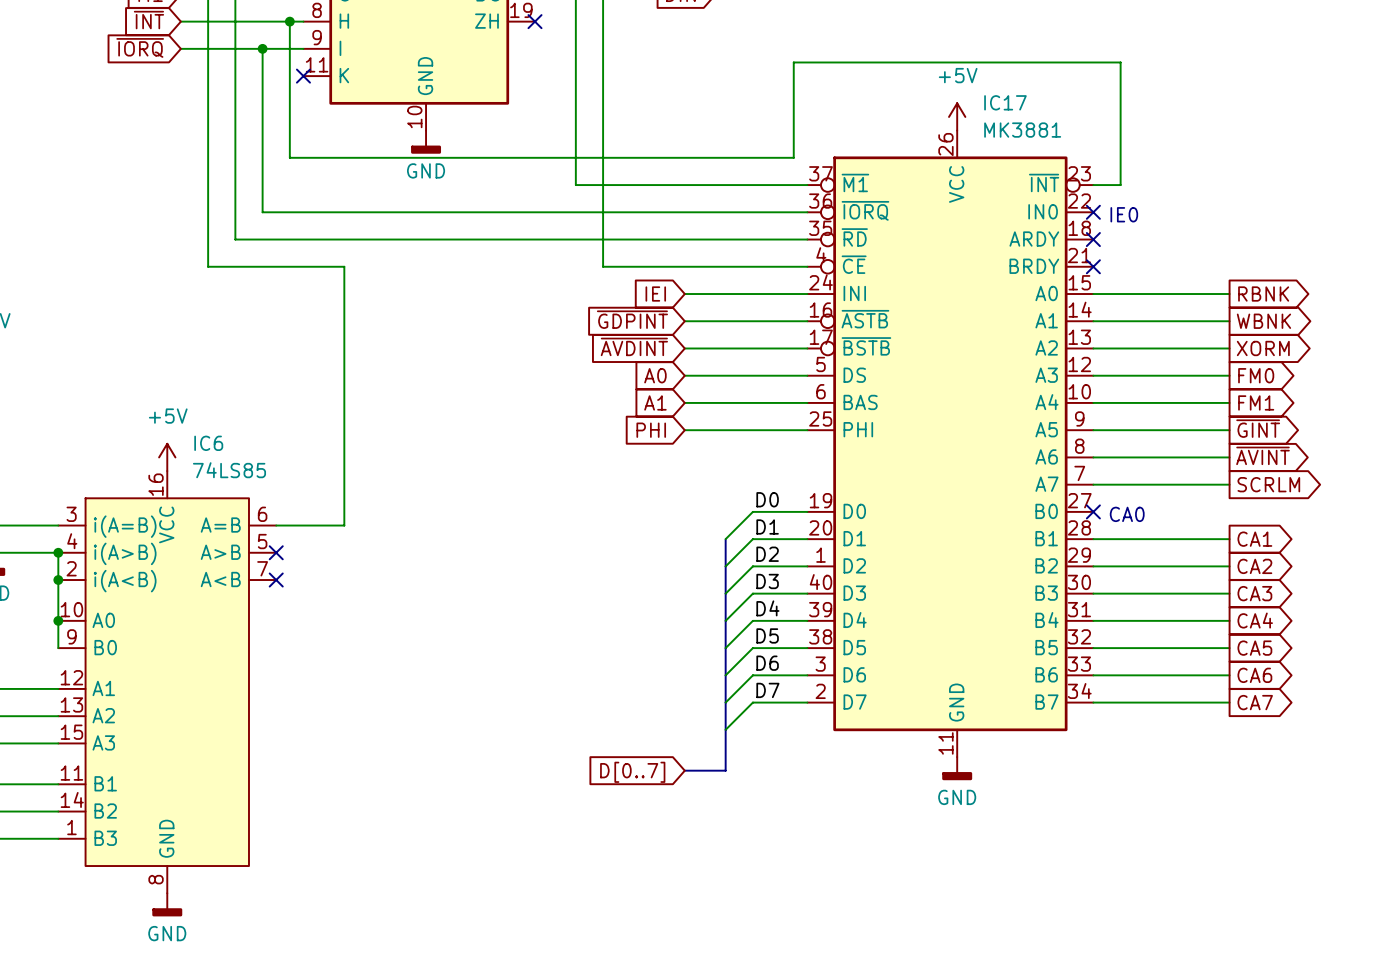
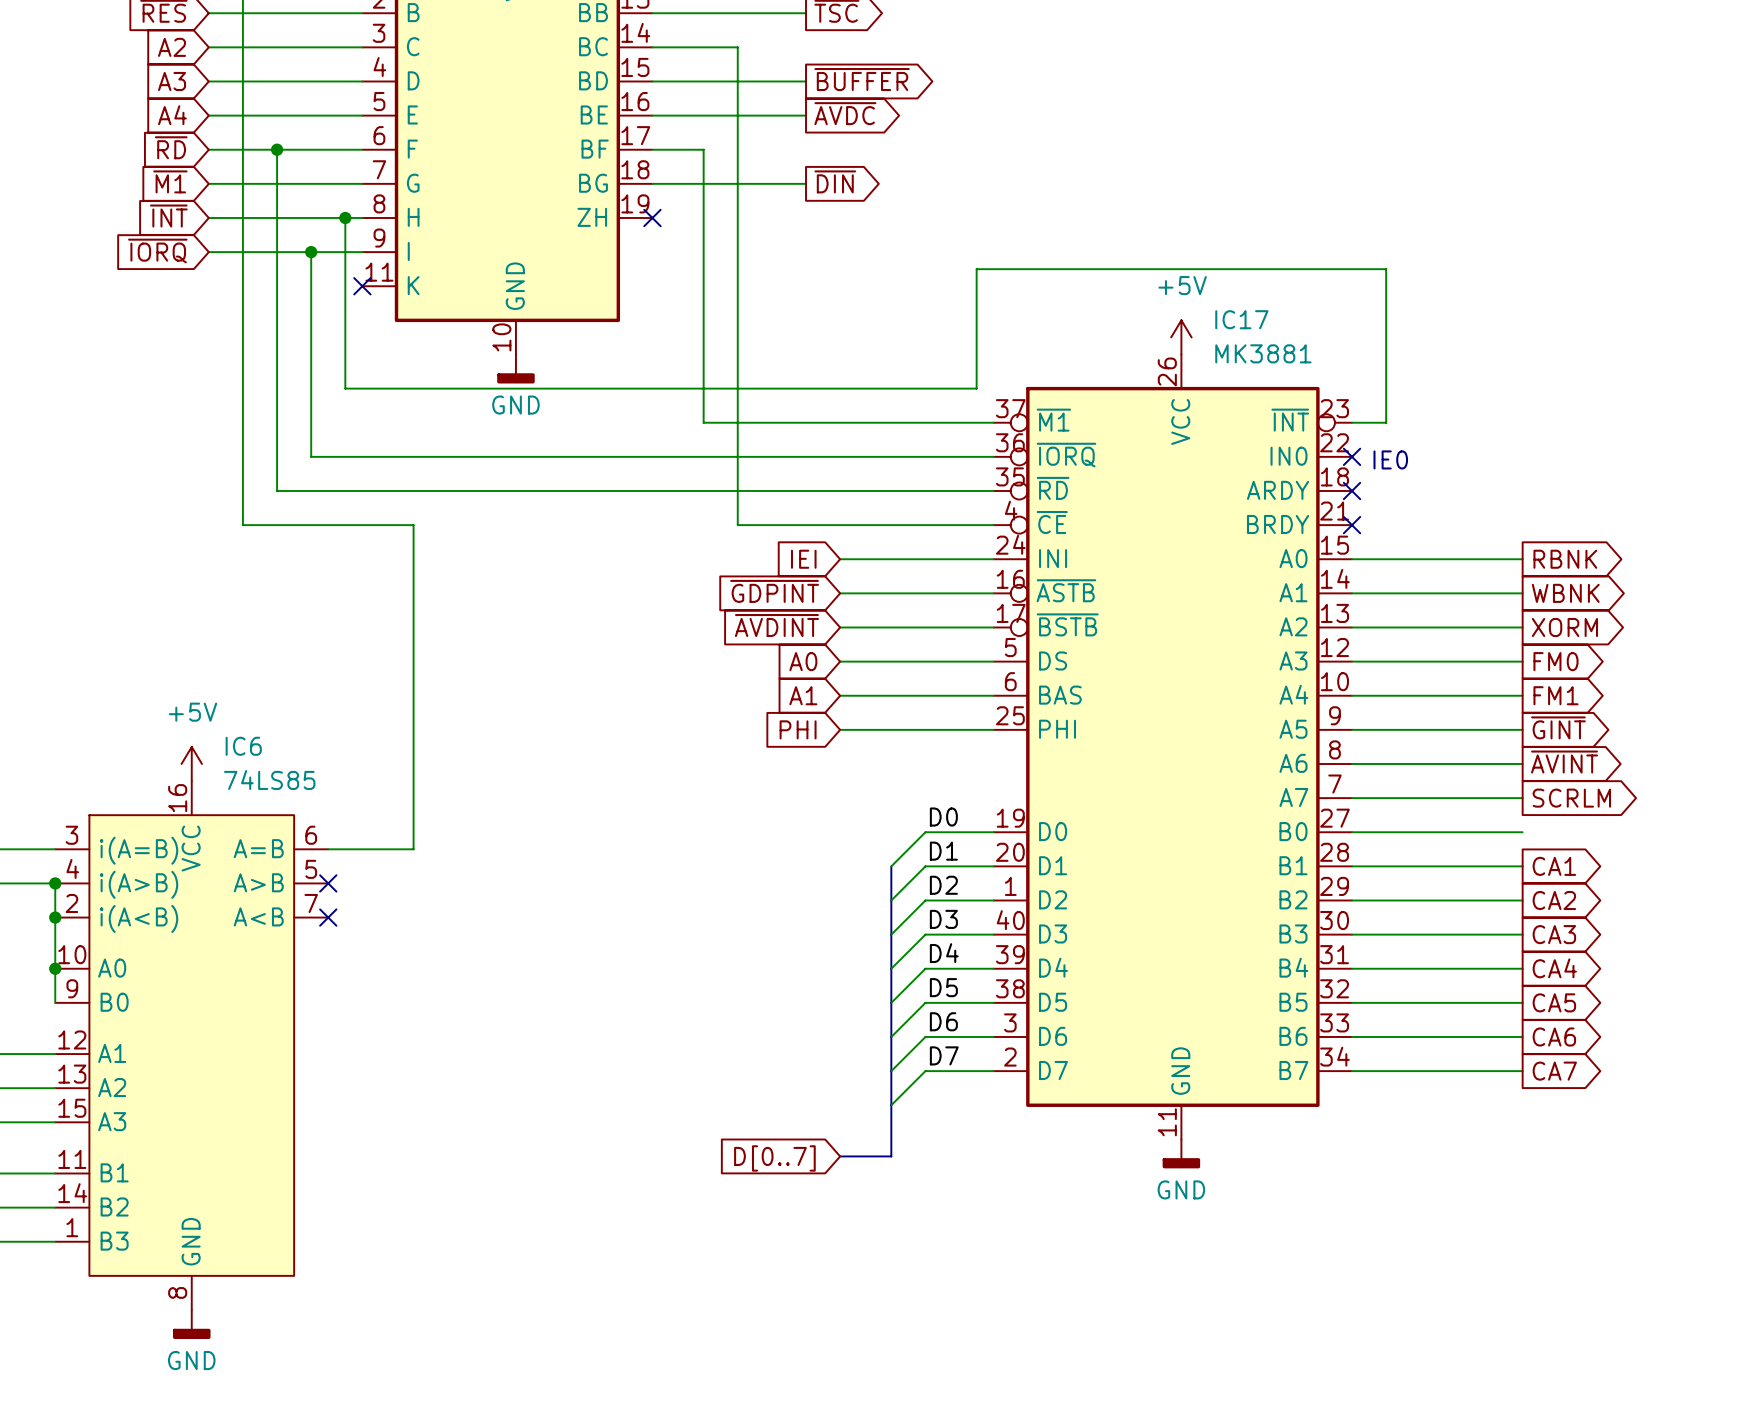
wire: none -> (1352, 832) (1522, 832)
no-connect mark: (1093, 511) -> none
text: CA0 (1127, 514) -> none

